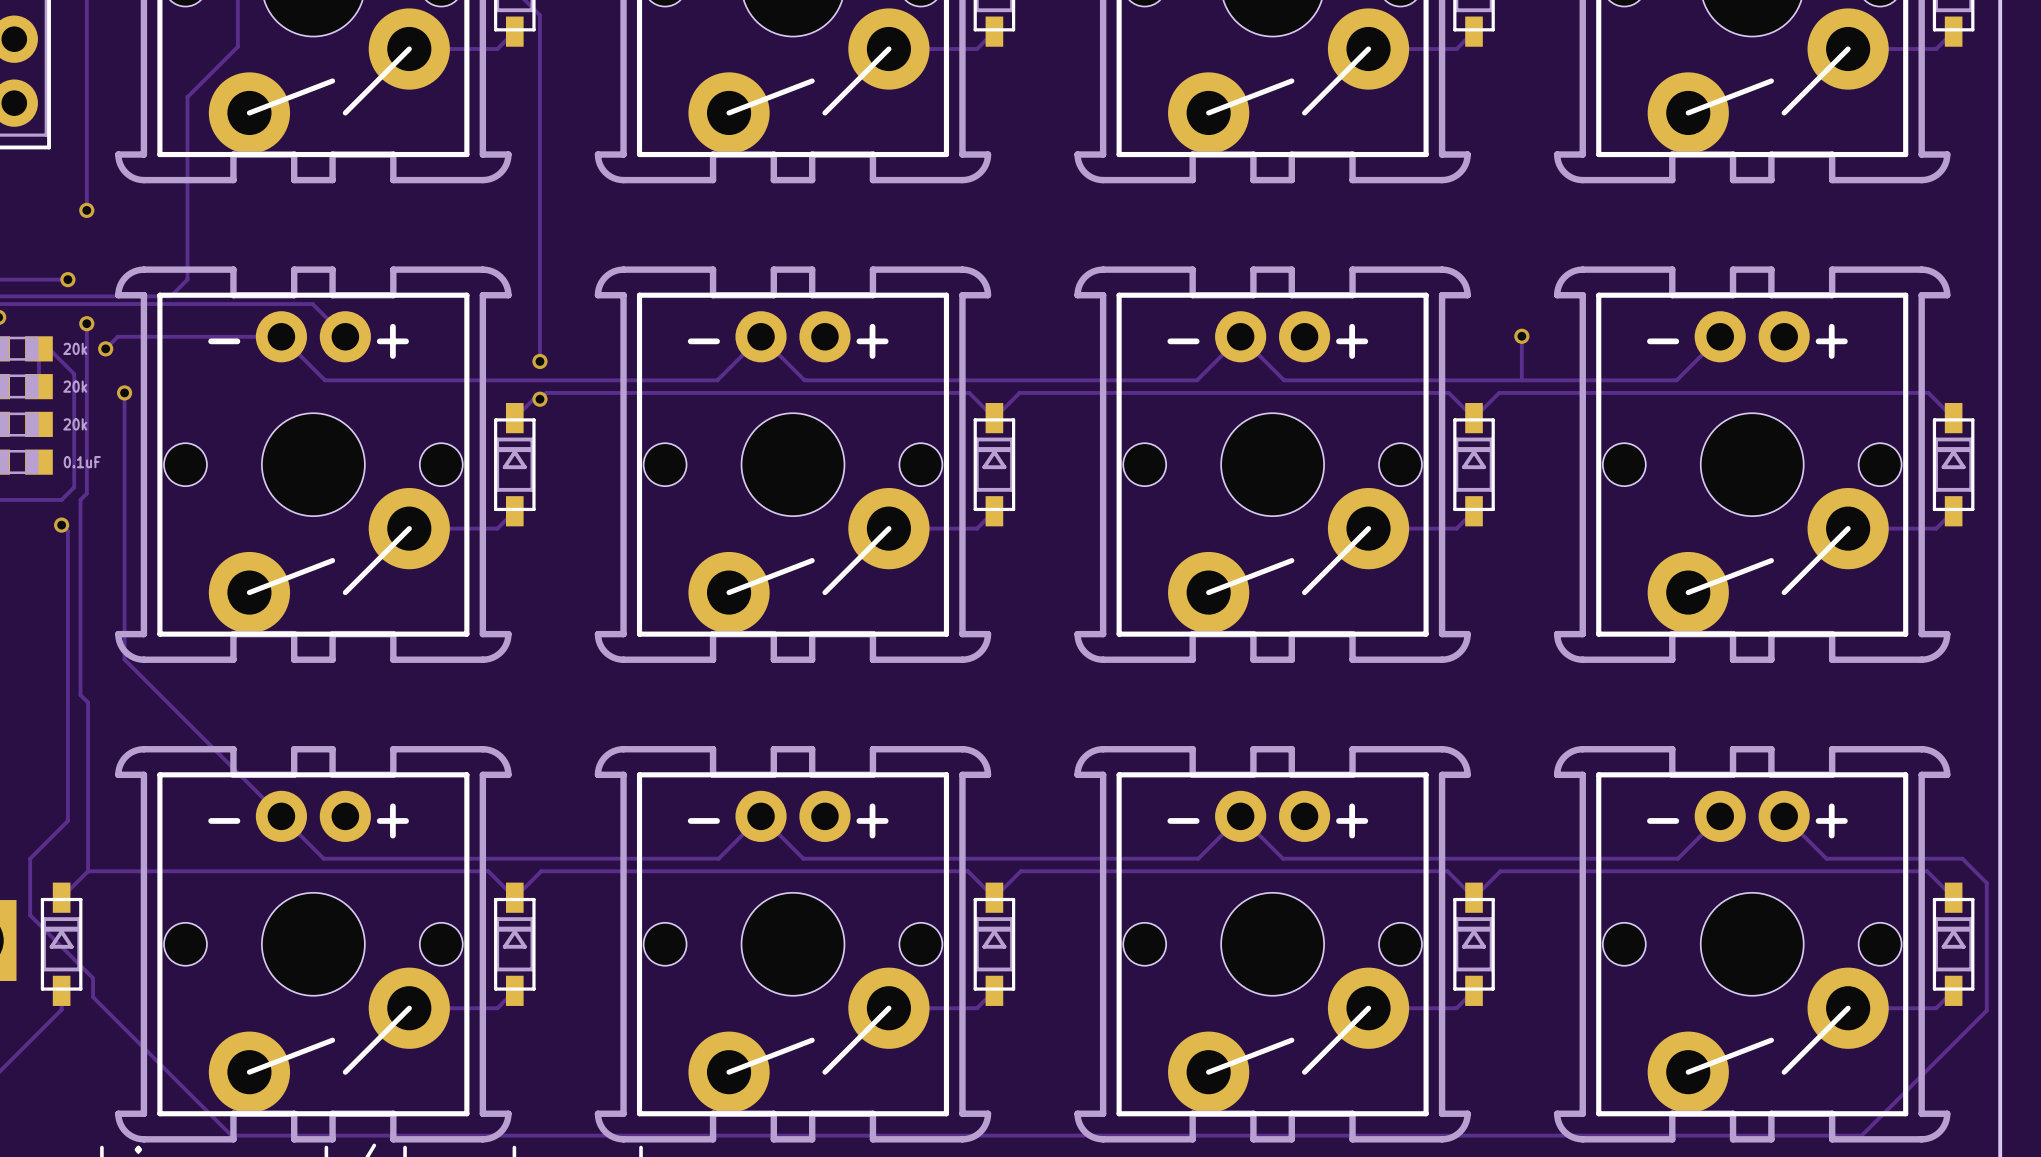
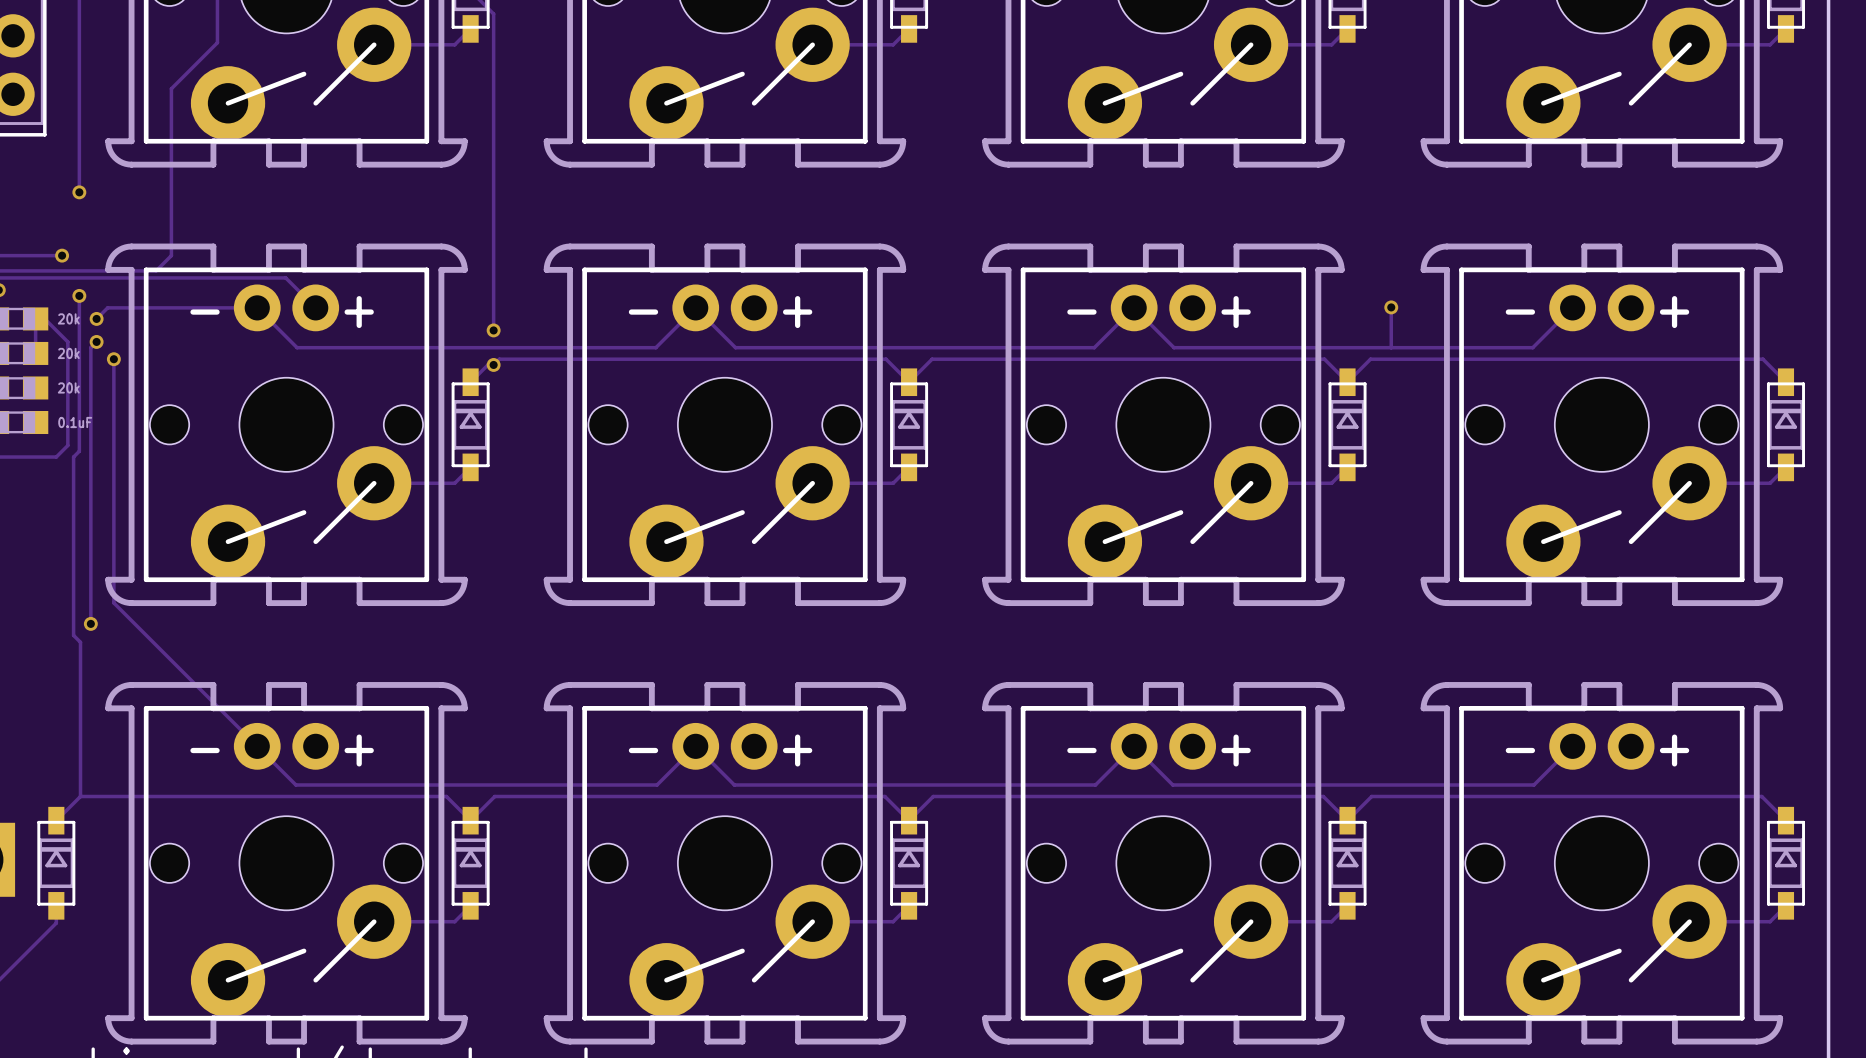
track: none -> (96, 341) (90, 347) (90, 623)
via: none -> (96, 341)
track: (61, 525) (67, 531) (67, 820) (30, 858) (30, 915) (93, 978) (93, 997) (231, 1135) (1861, 1135) (1986, 1010) (1986, 883) (1962, 858) (1826, 858) (1784, 816) -> none
via: (61, 525) -> none
via: none -> (90, 623)

